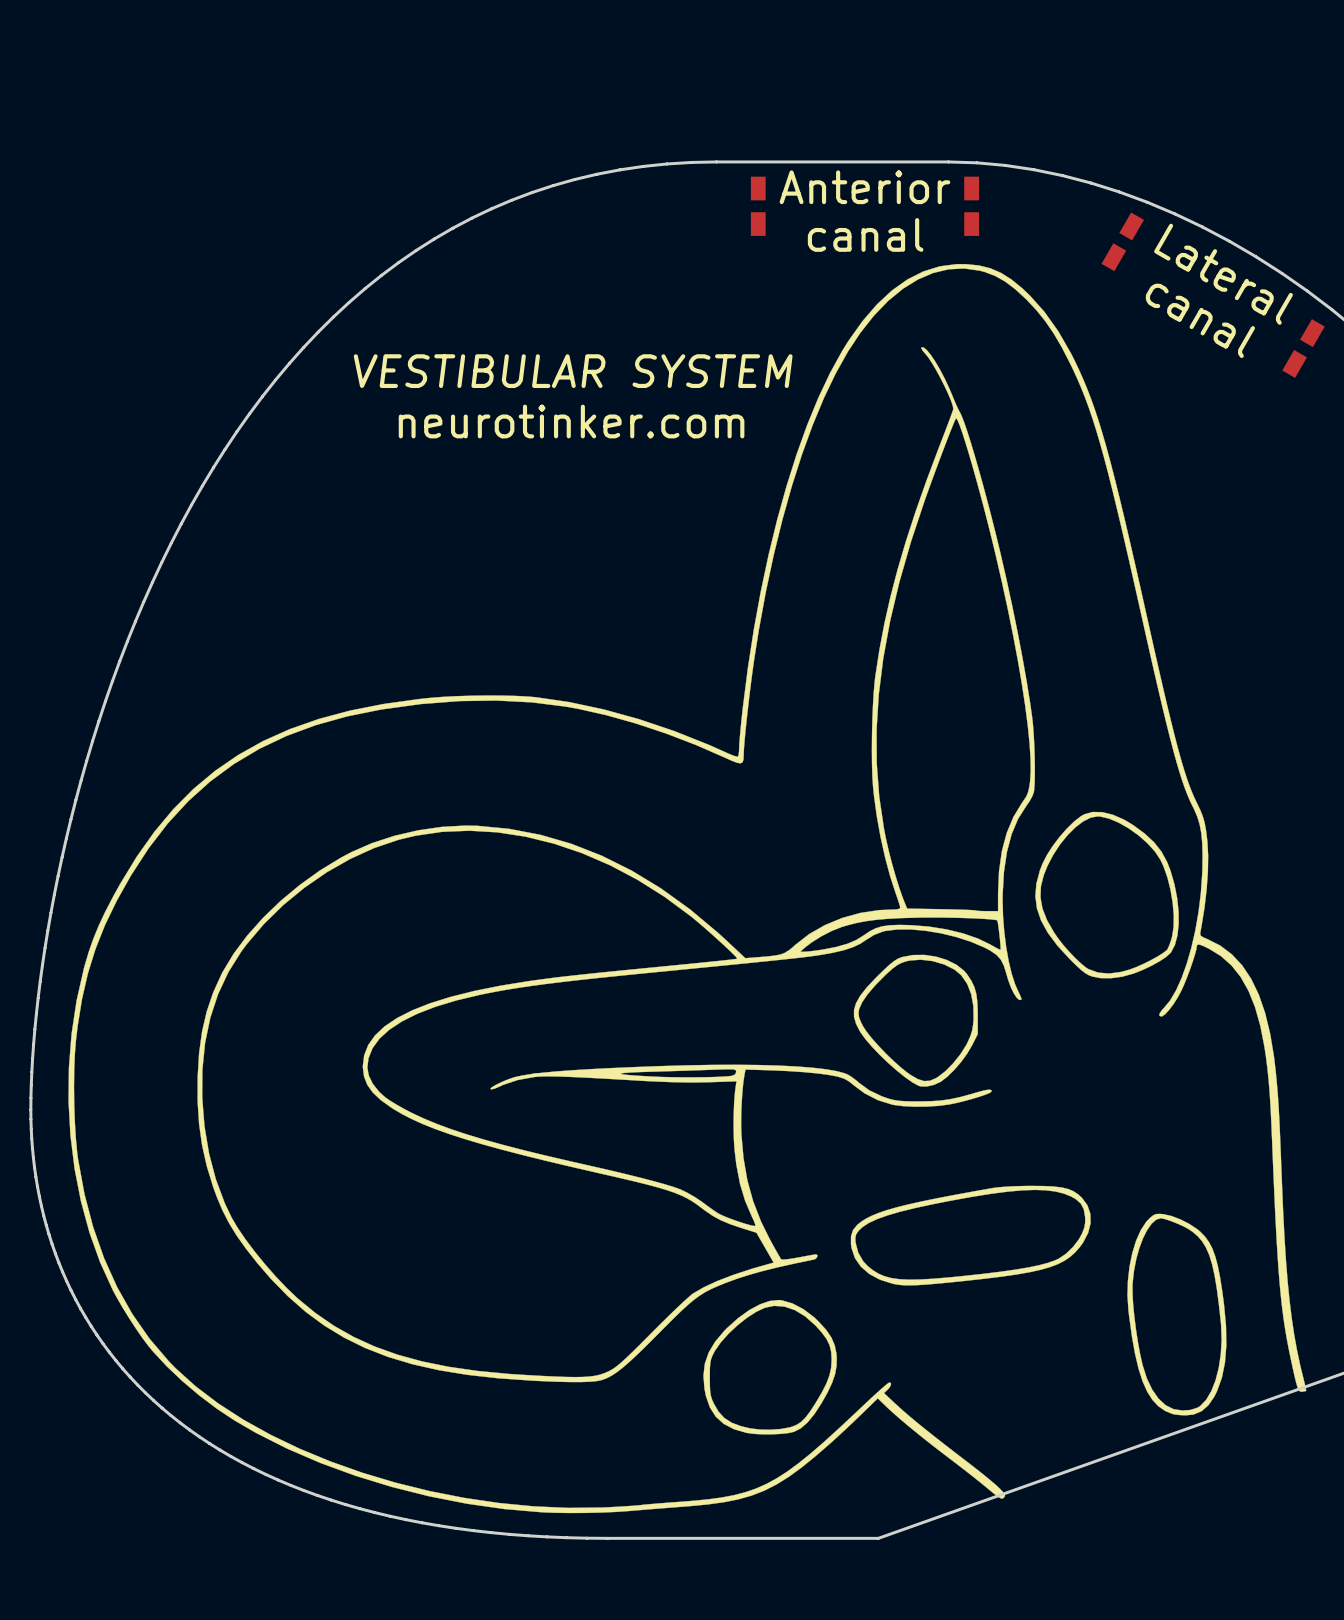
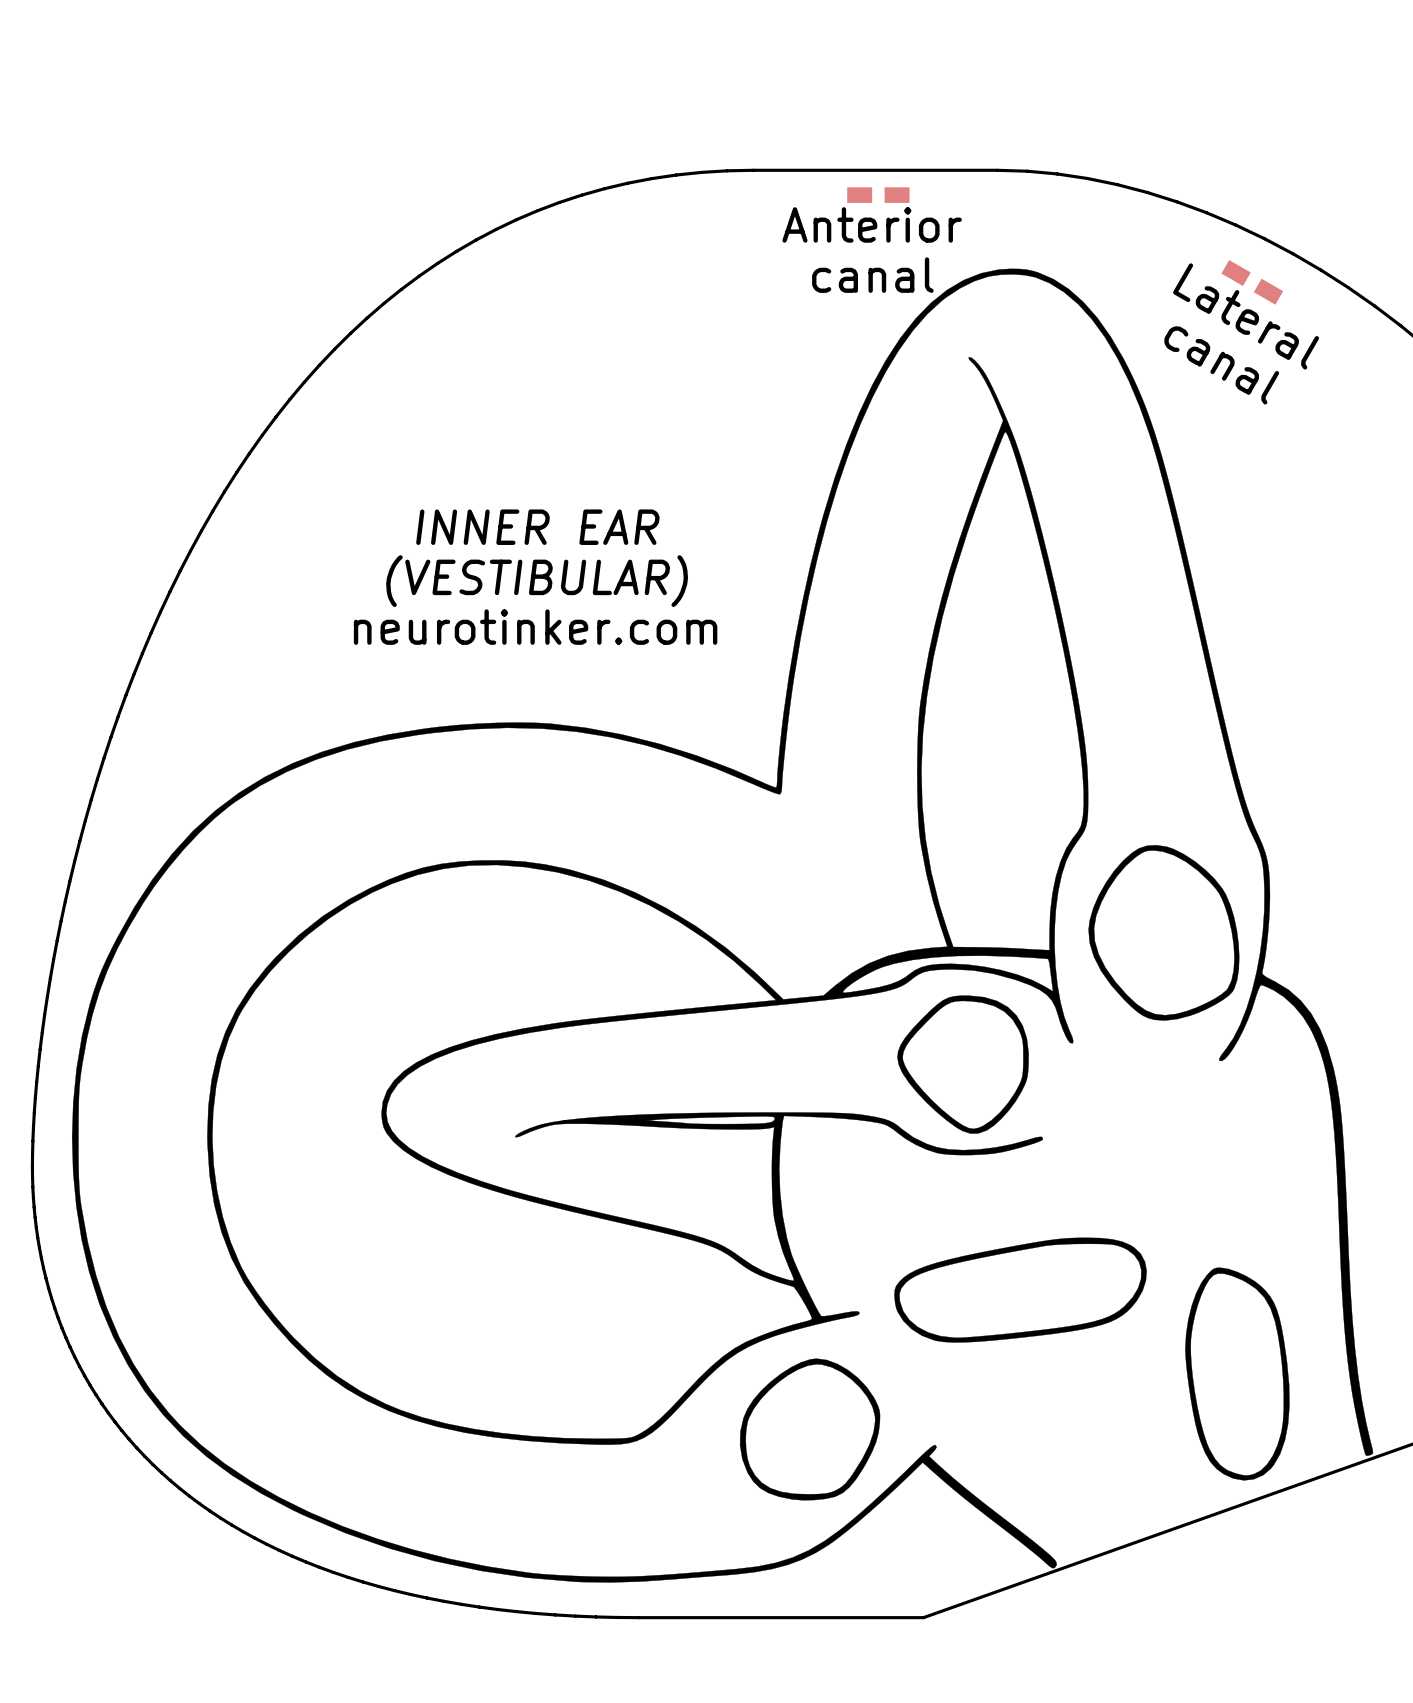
part: none -> (878, 195)
text position: Anterior (864, 187) -> Anterior (872, 224)
part: (758, 206) -> none
part: (971, 206) -> none
text position: canal (865, 234) -> canal (872, 275)
part: (1122, 241) -> none
drawing shape: [68, 264, 1307, 1514] -> [71, 268, 1374, 1583]
part: none -> (1252, 282)
text position: Lateral (1223, 274) -> Lateral (1246, 316)
text position: canal (1200, 320) -> canal (1221, 365)
part: (1303, 348) -> none
text: VESTIBULAR SYSTEM (573, 371) -> none
text position: neurotinker.com (571, 421) -> neurotinker.com (535, 627)
text: none -> INNER EAR (537, 527)
text: none -> (VESTIBULAR) (537, 581)

